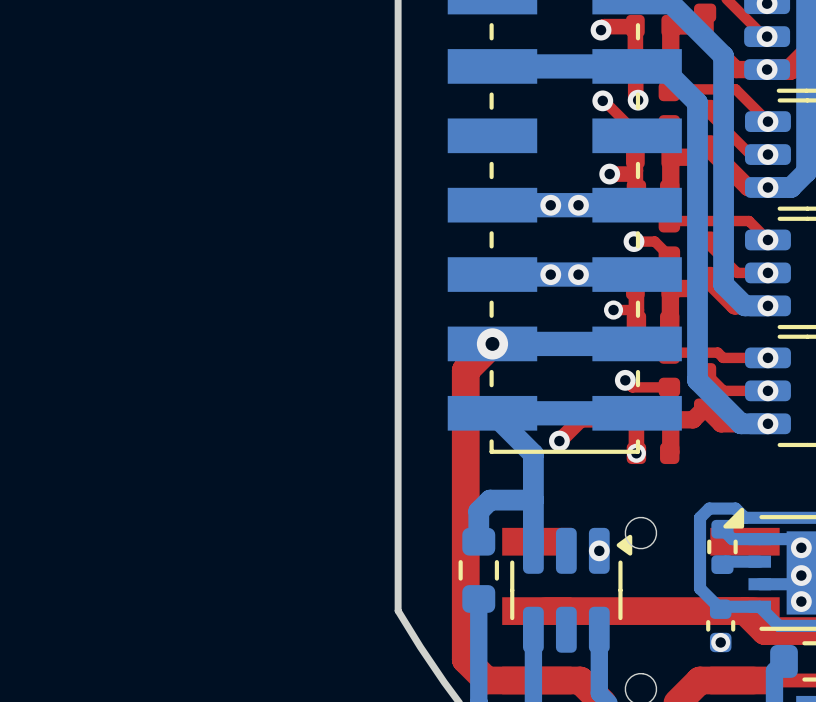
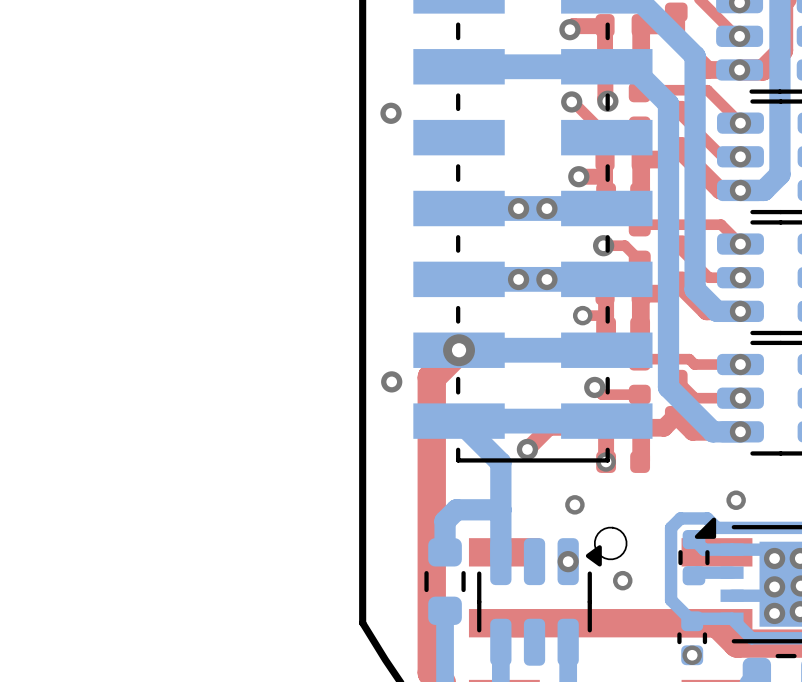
via: none -> (391, 113)
via: none -> (391, 381)
via: none -> (736, 500)
via: none -> (574, 504)
via: none -> (622, 580)

